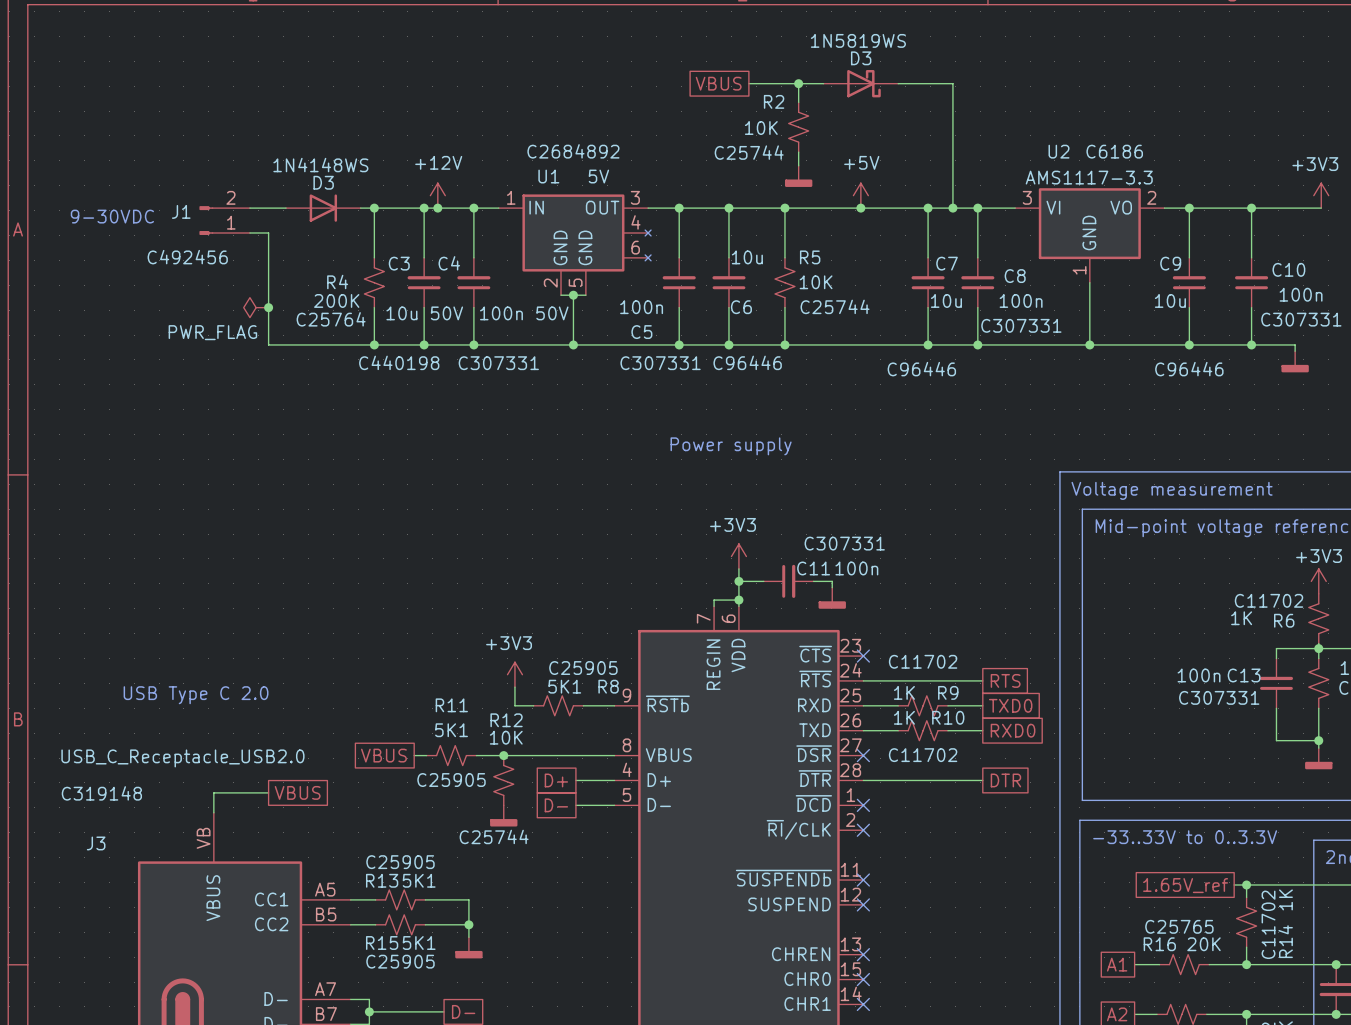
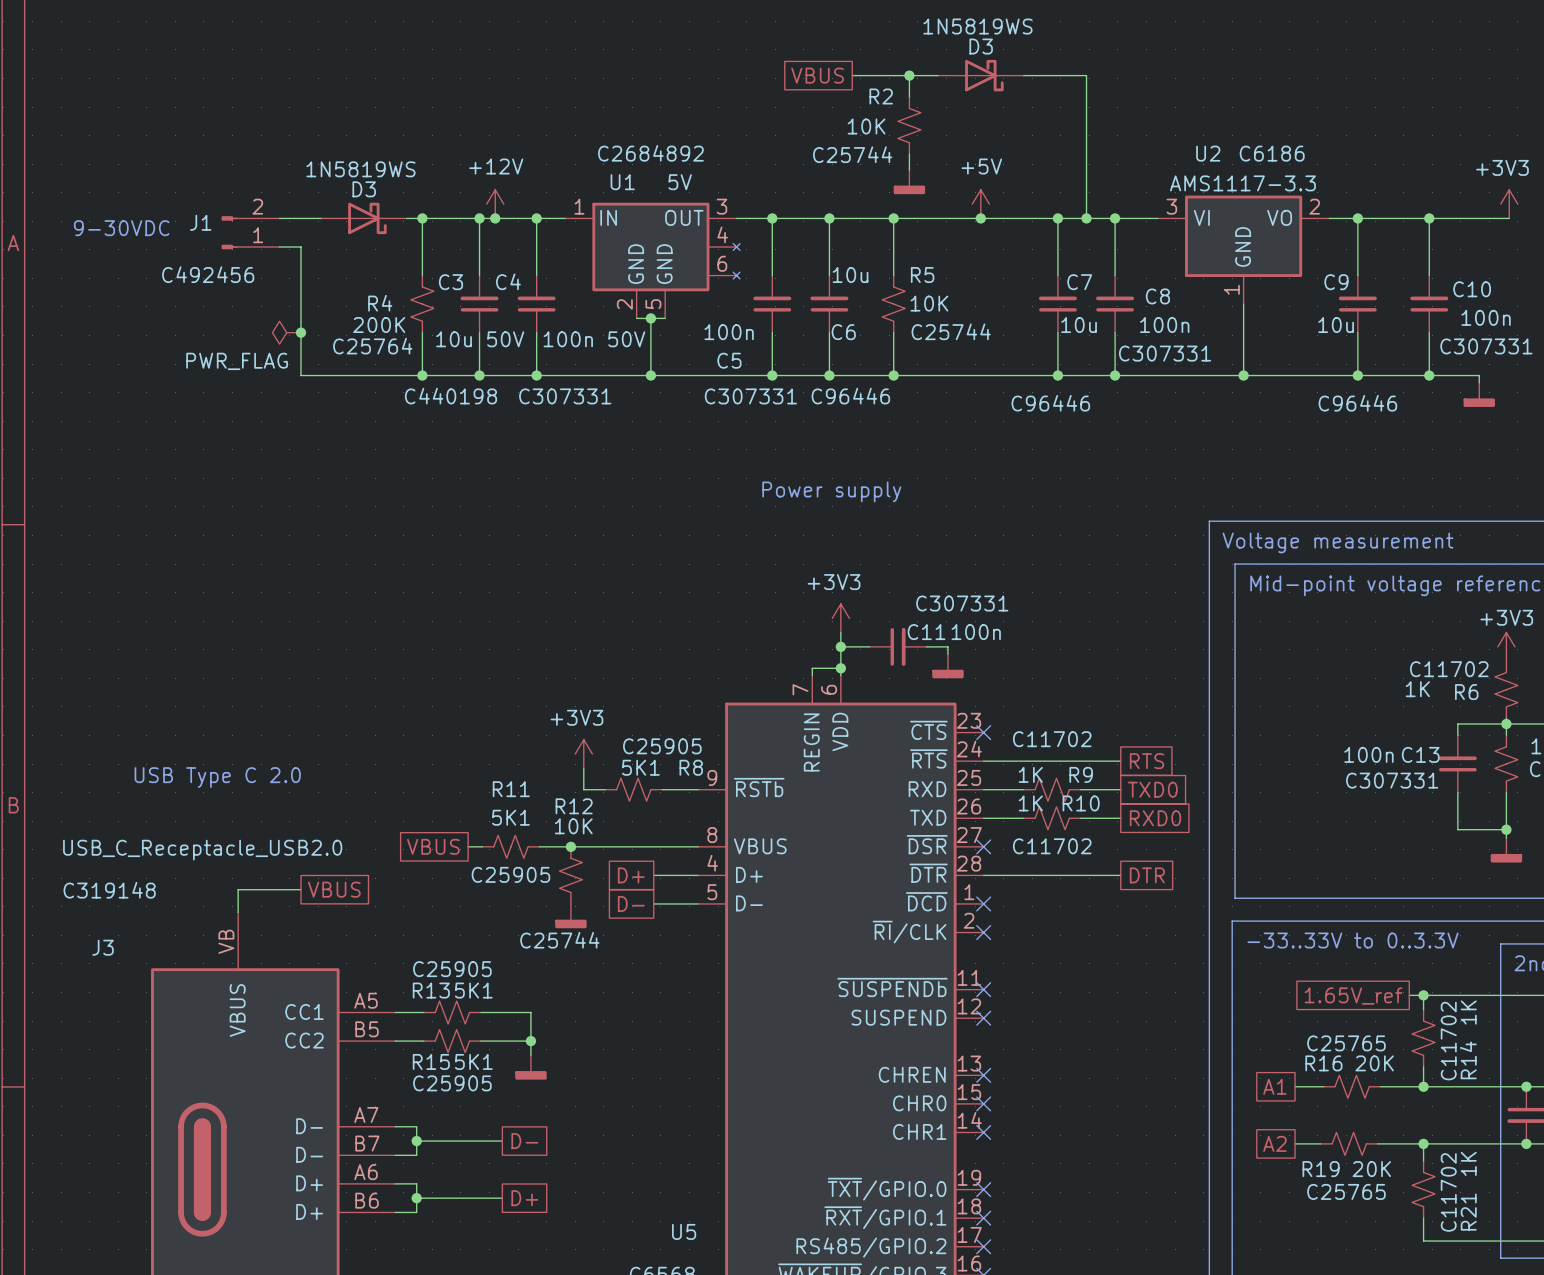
D3 value: 1N4148WS (320, 165) -> 1N5819WS (360, 169)
D3 symbol: [286, 194, 361, 222] -> [321, 202, 407, 235]

